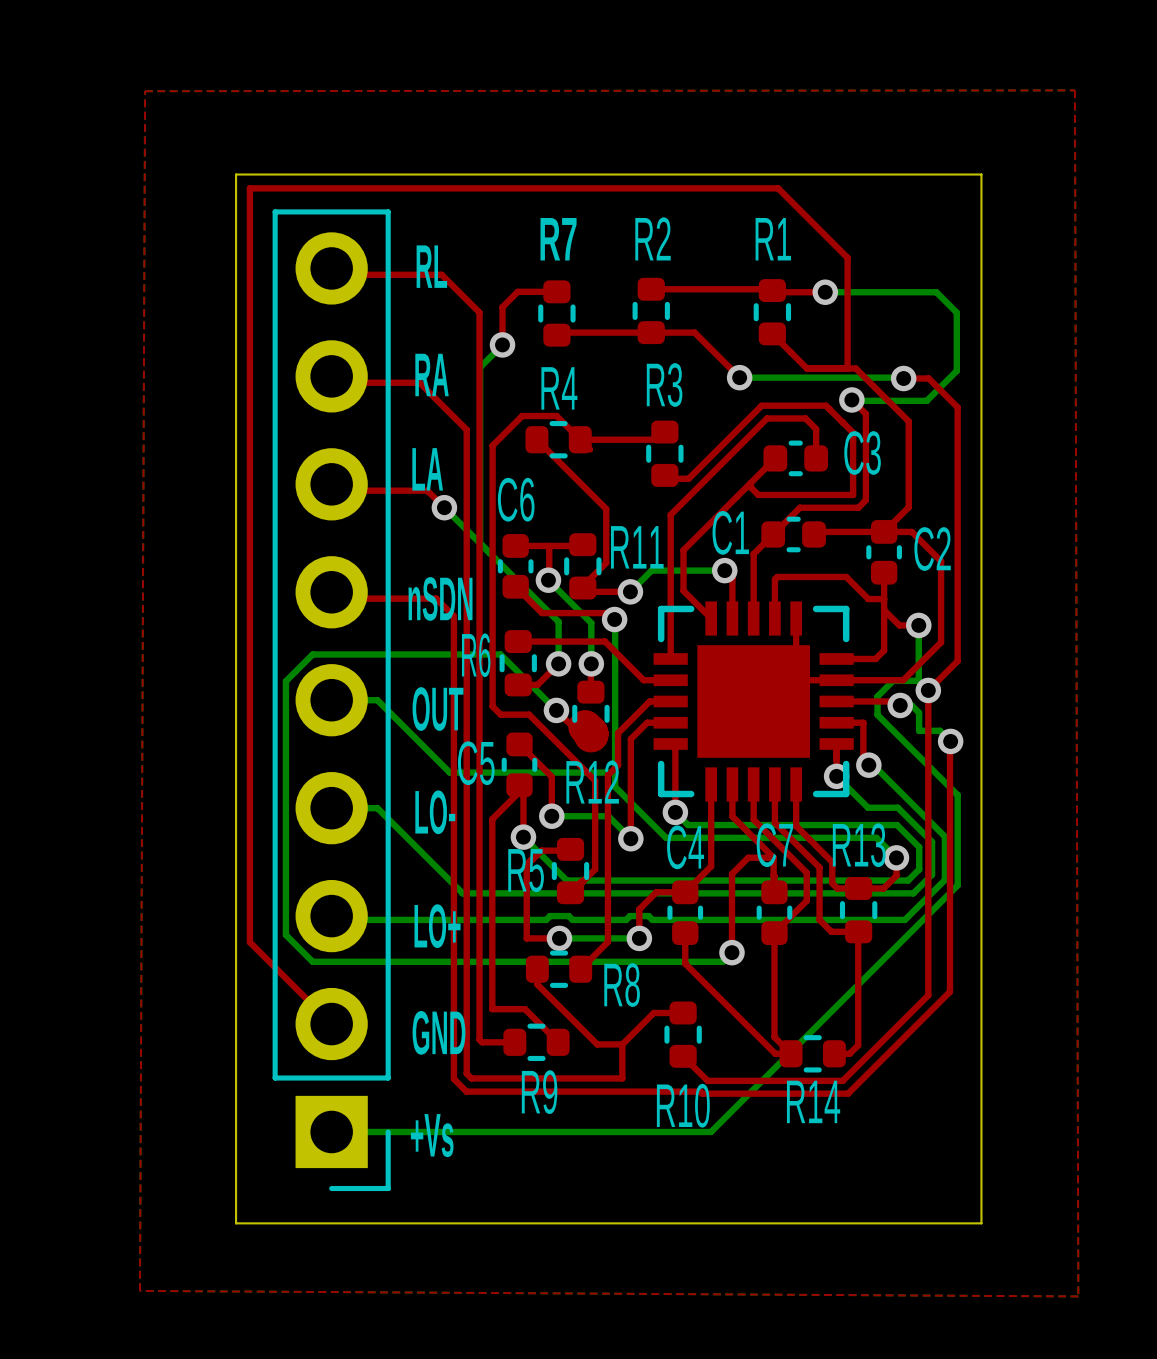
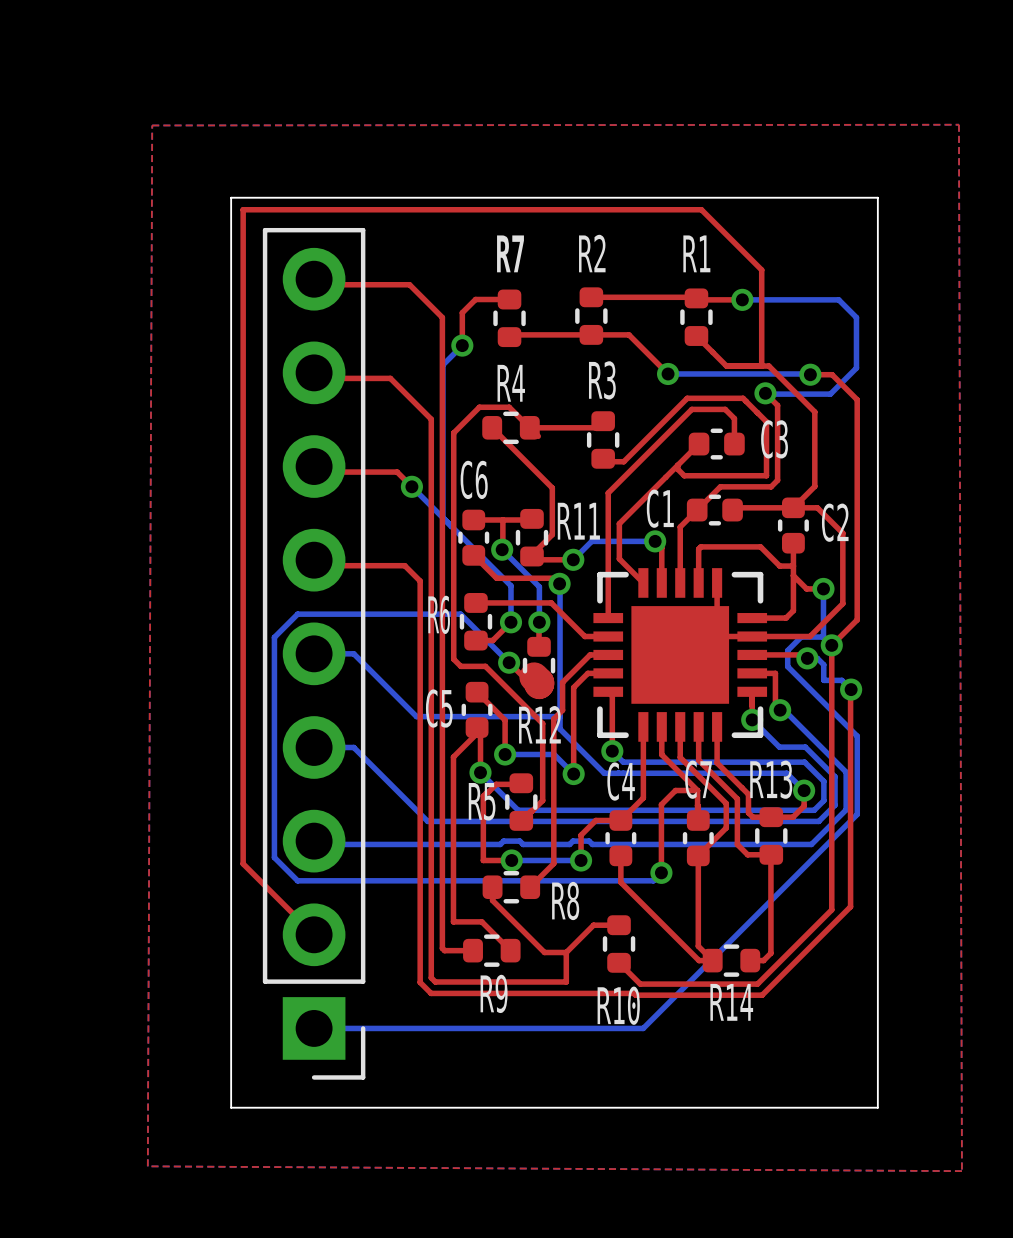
text: RL (431, 266) -> none
text: RA (432, 375) -> none
text: LA (427, 469) -> none
text: nSDN (440, 598) -> none
text: OUT (438, 709) -> none
text: LO- (435, 812) -> none
text: LO+ (437, 926) -> none
text: GND (439, 1032) -> none
text: +Vs (432, 1135) -> none

